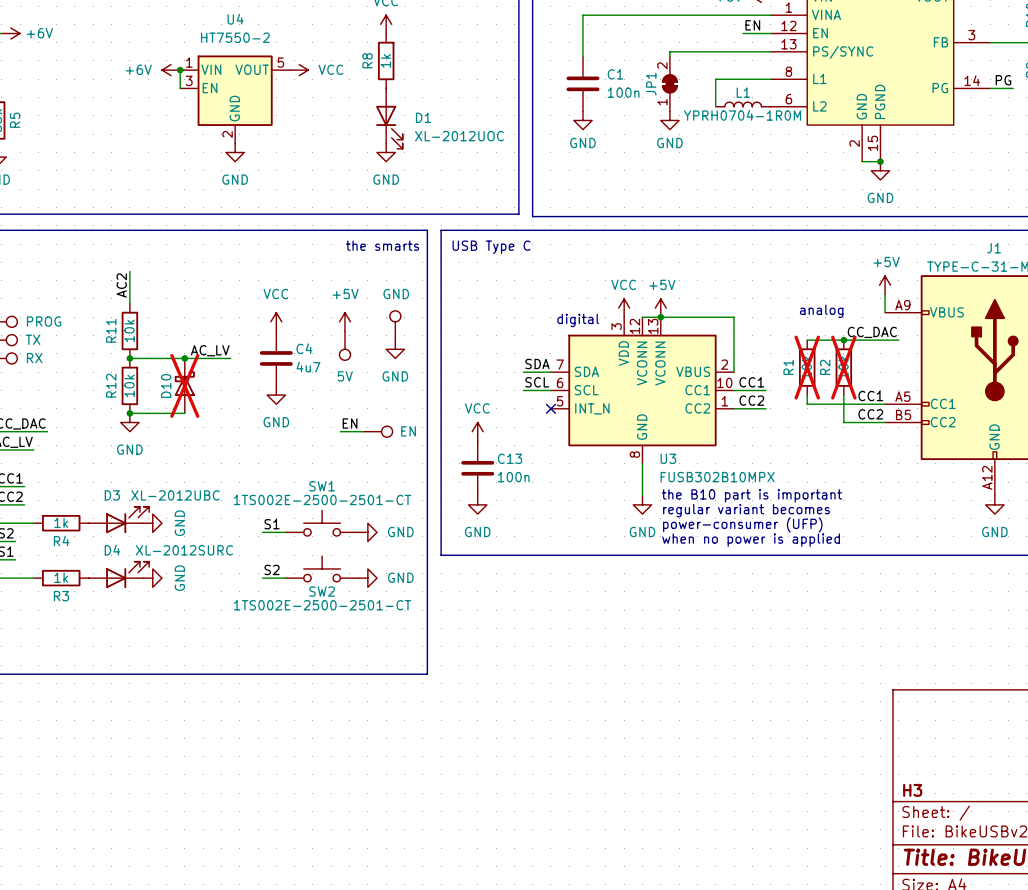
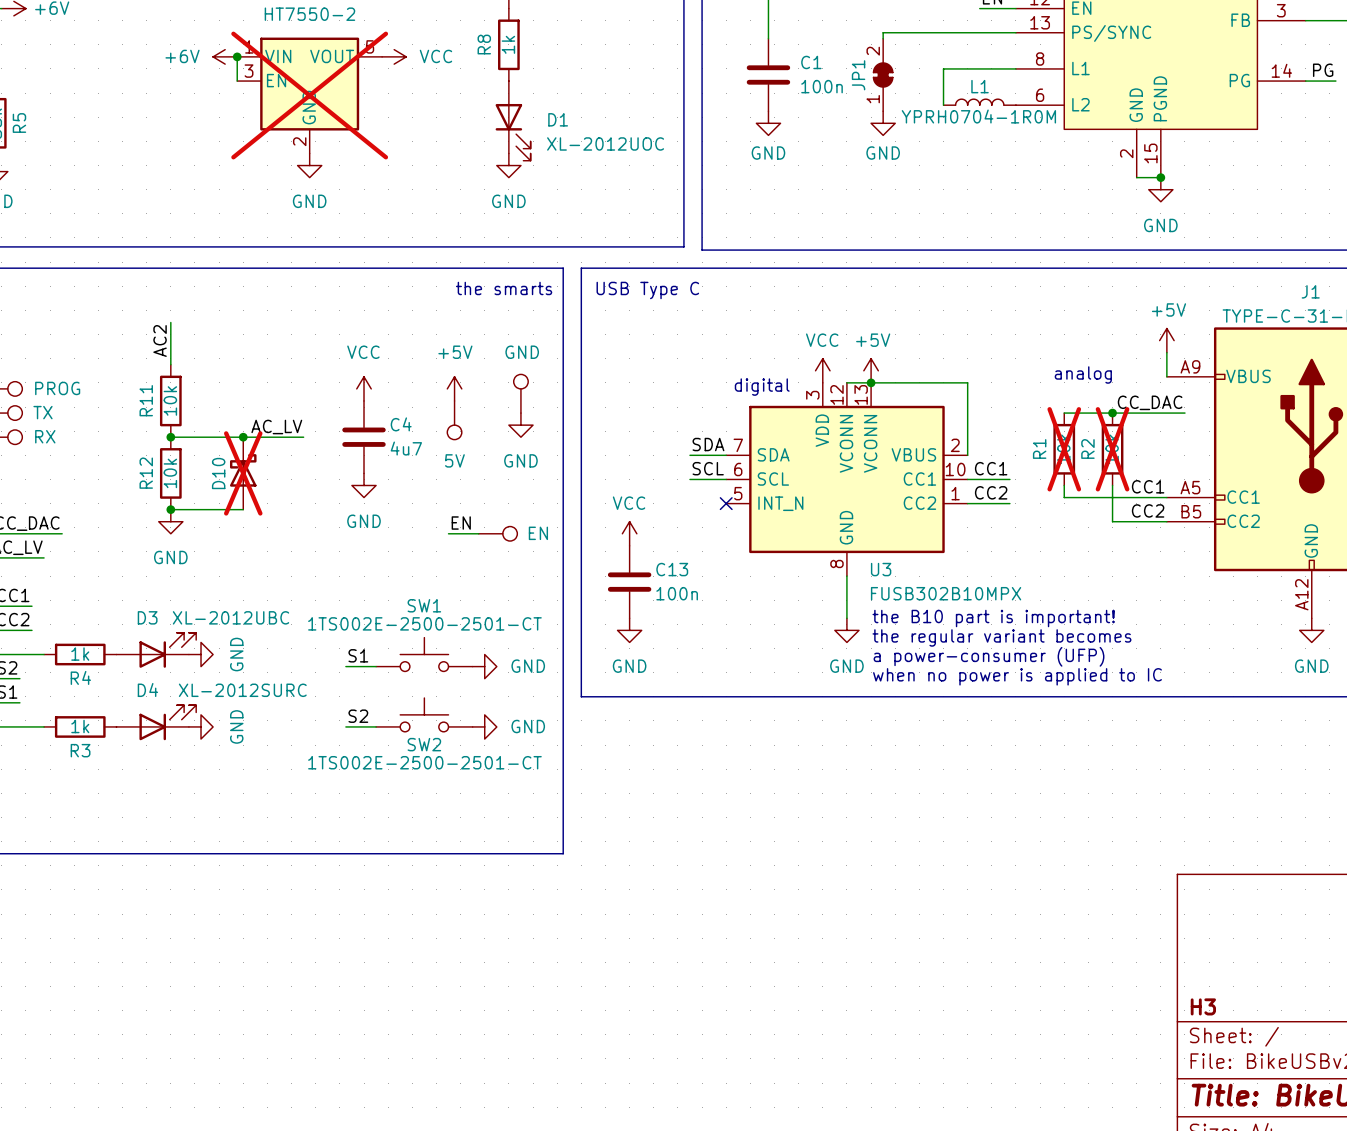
U4 do-not-place cross: none -> (309, 95)
text: the B10 part is important (751, 495) -> the B10 part is important! (993, 618)
text: regular variant becomes (746, 510) -> the regular variant becomes (1001, 637)
text: power-consumer (UFP) (742, 524) -> a power-consumer (UFP) (989, 656)
text: when no power is applied (751, 540) -> when no power is applied to IC (1017, 676)

